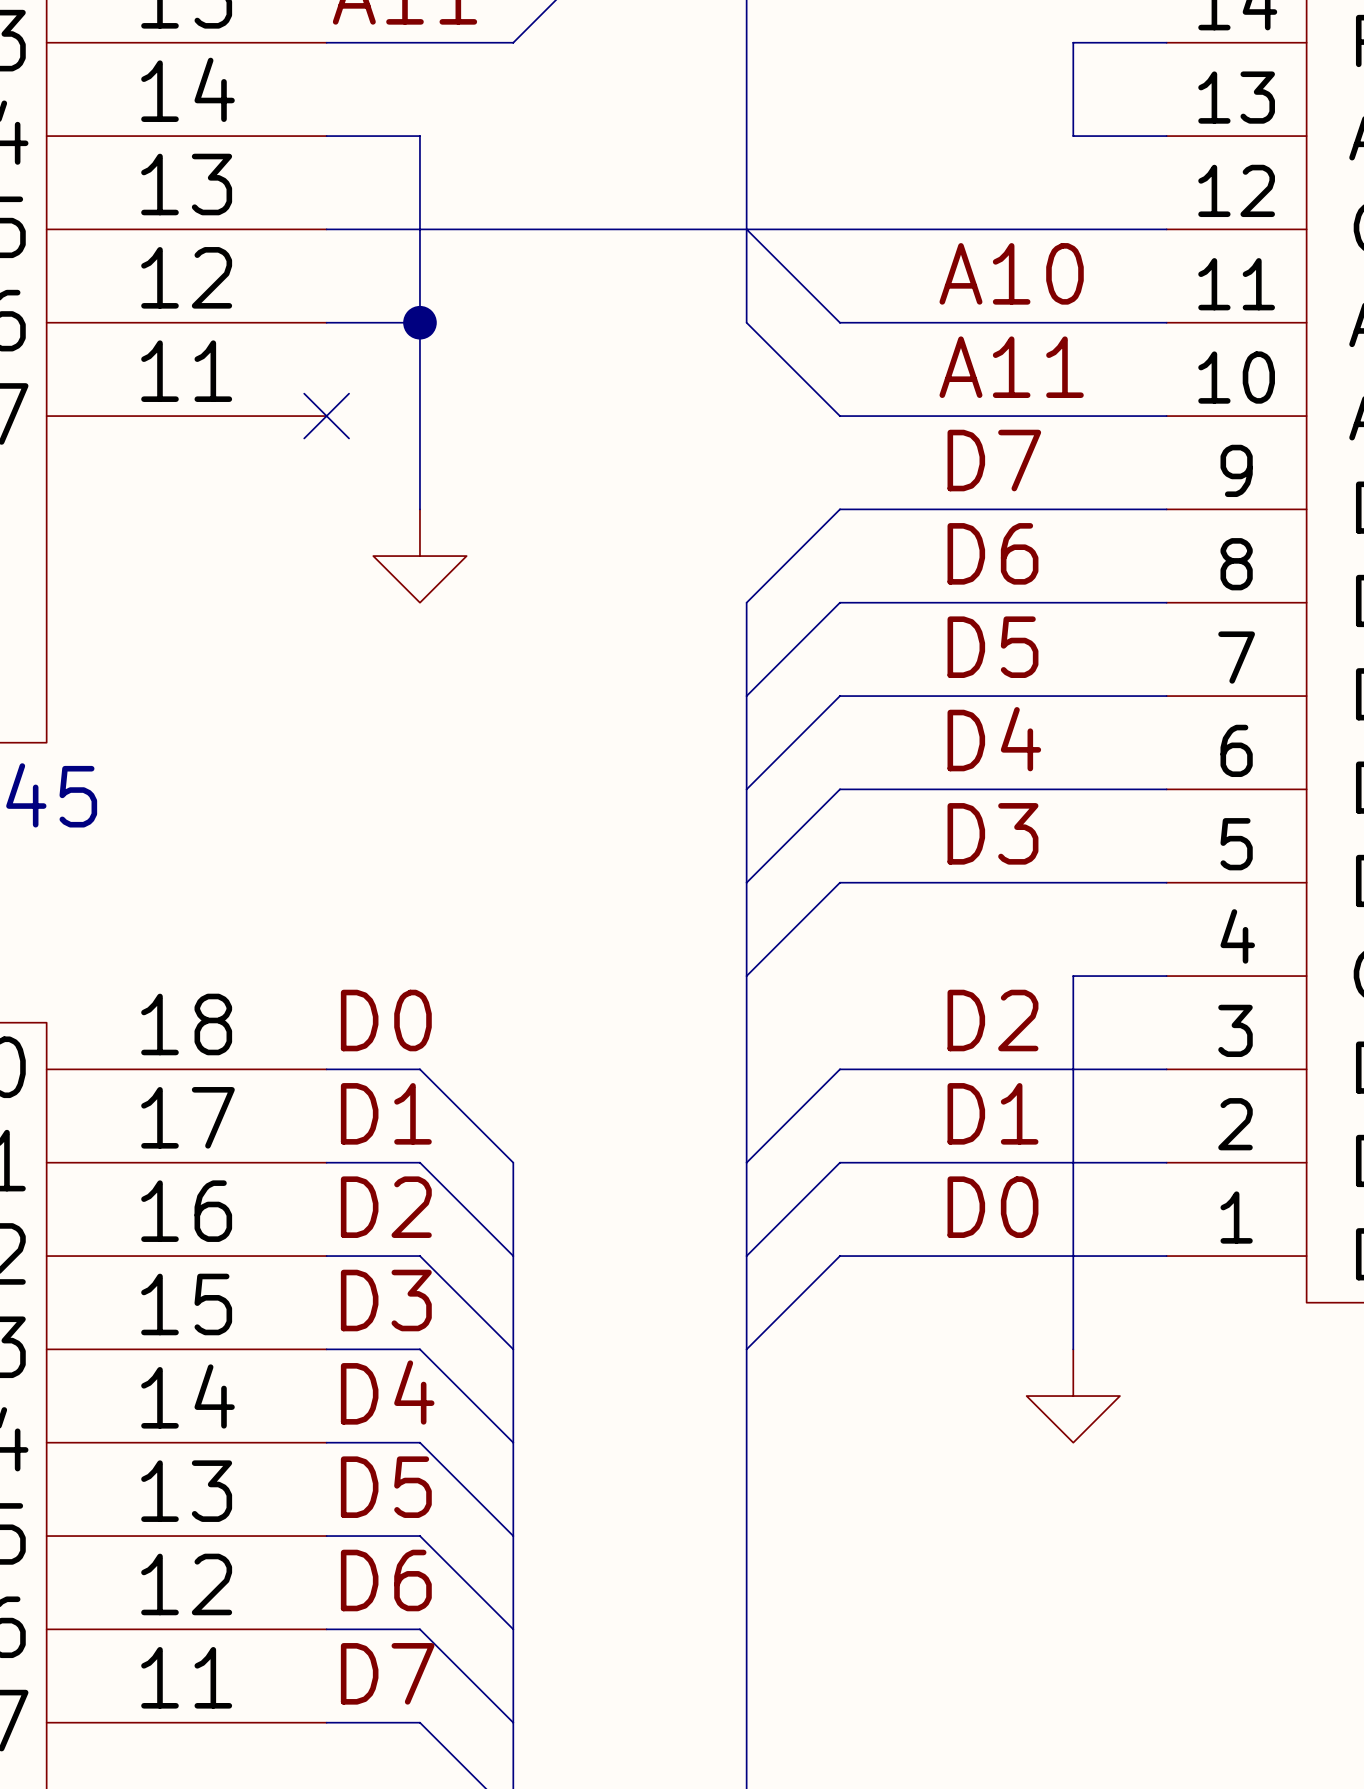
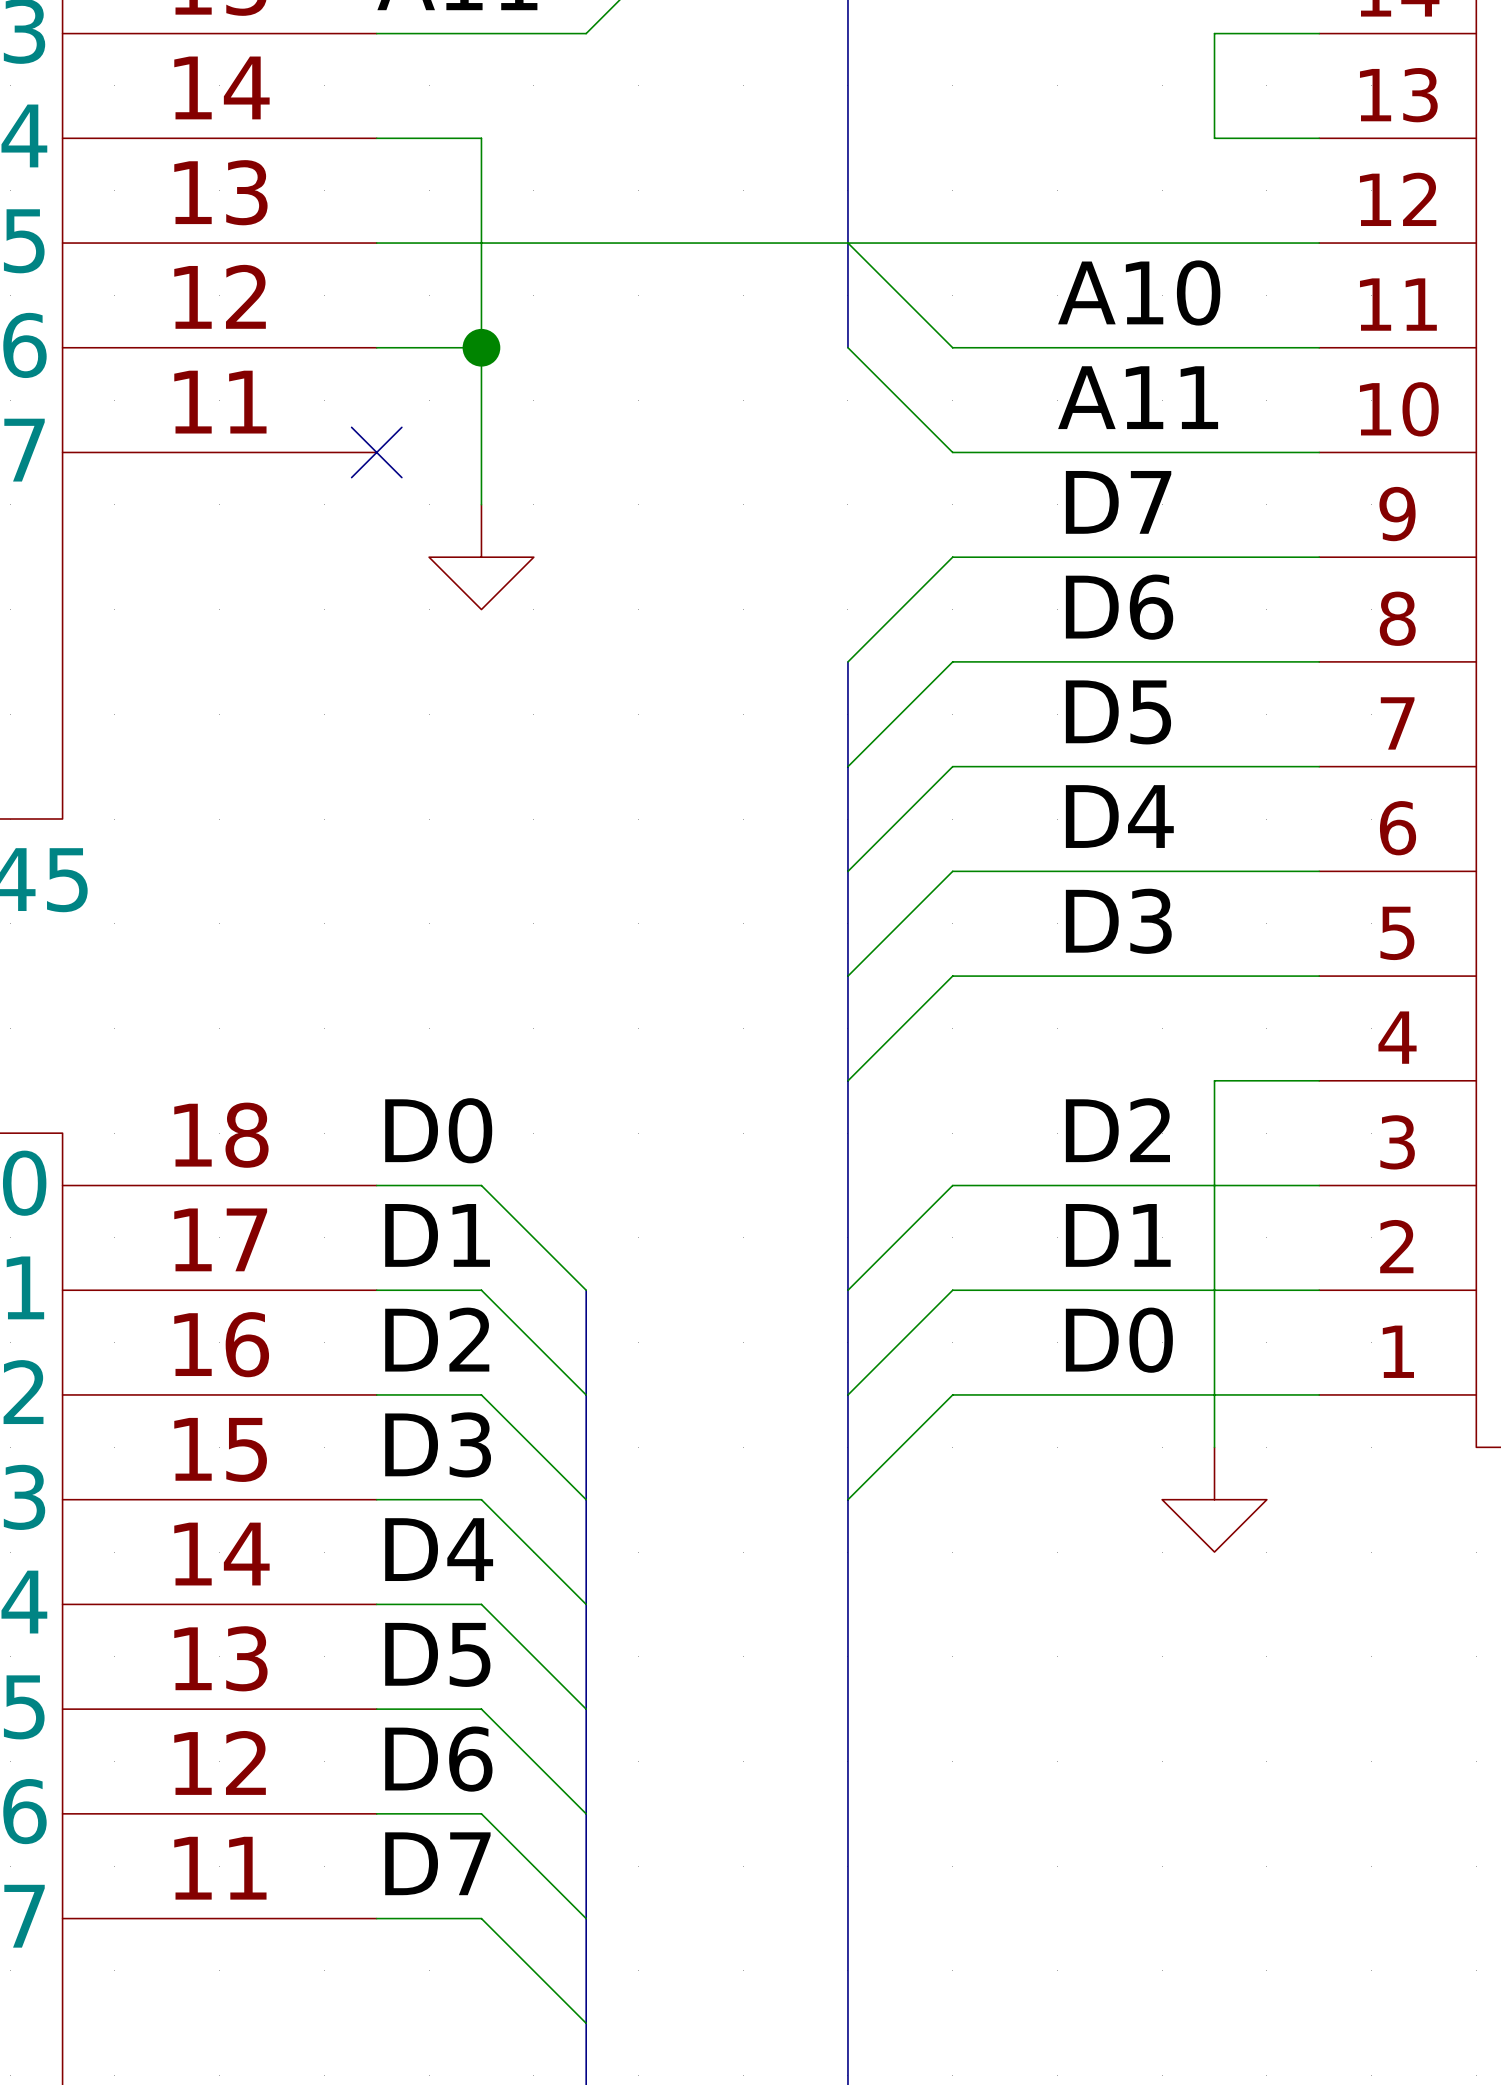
power symbol position: (419, 556) -> (481, 557)
power symbol position: (1073, 1396) -> (1214, 1499)

